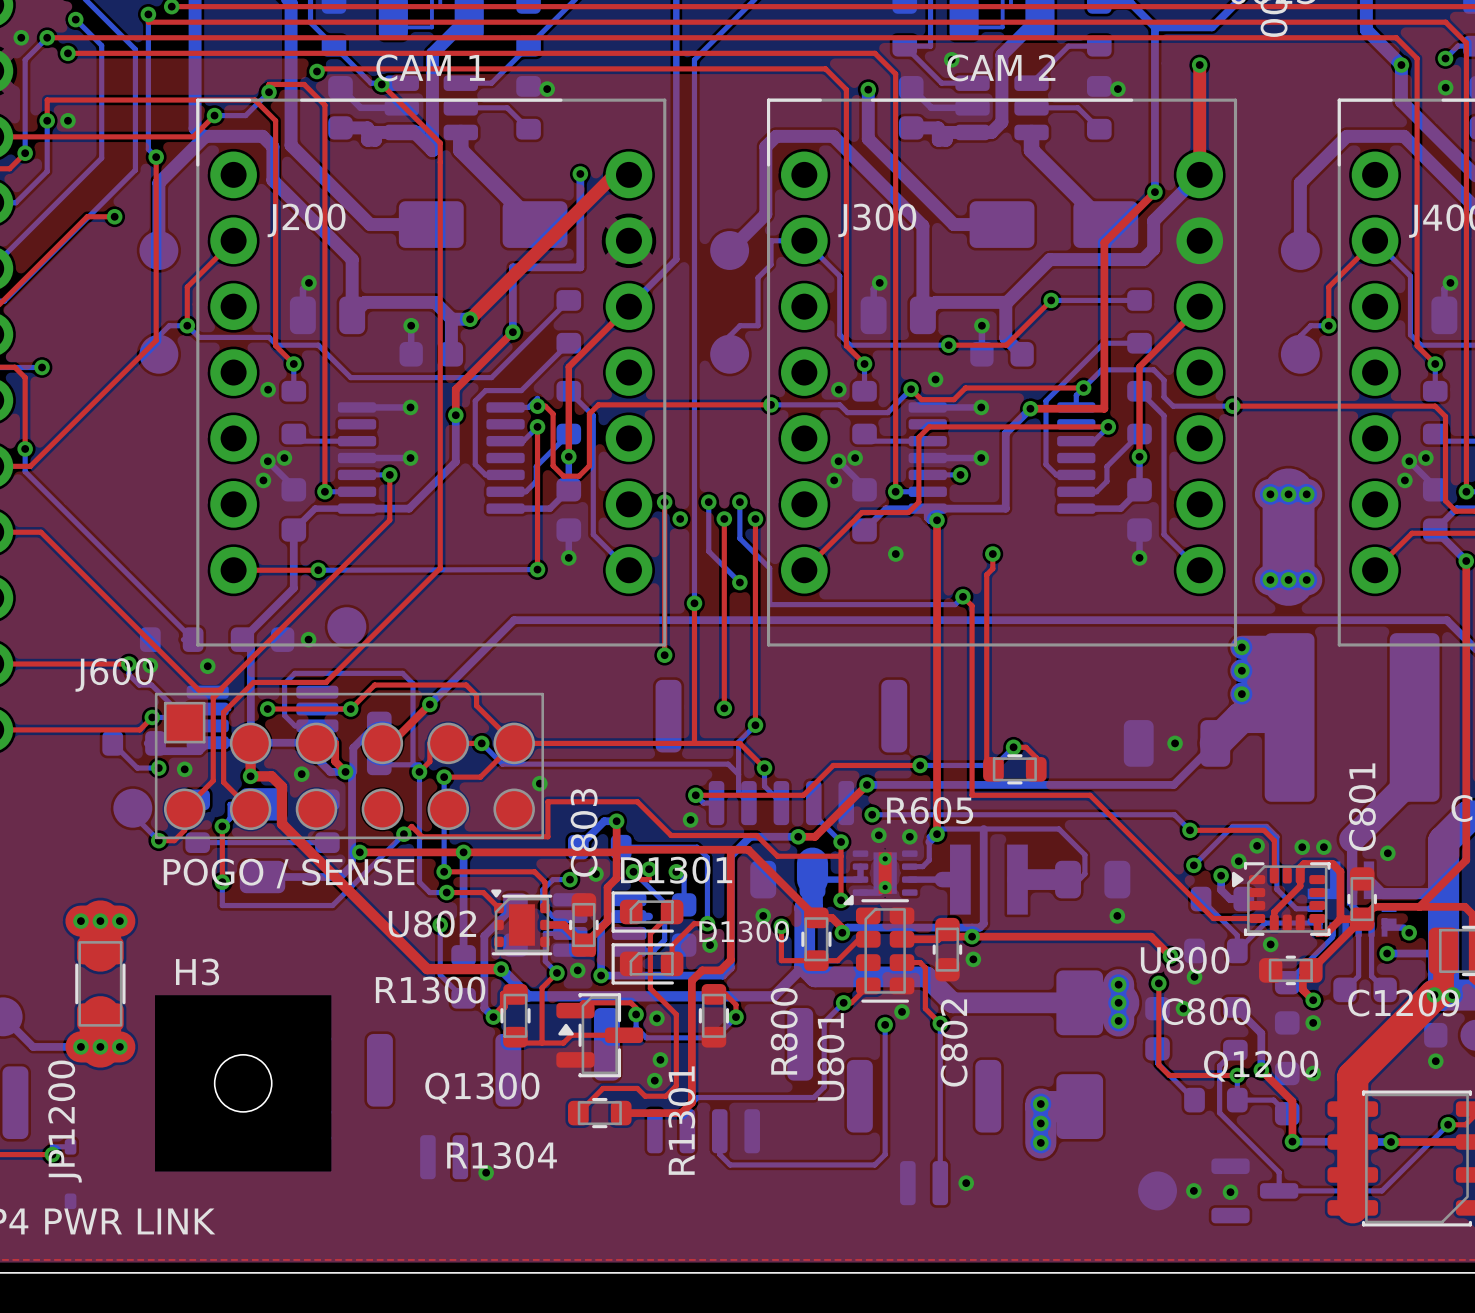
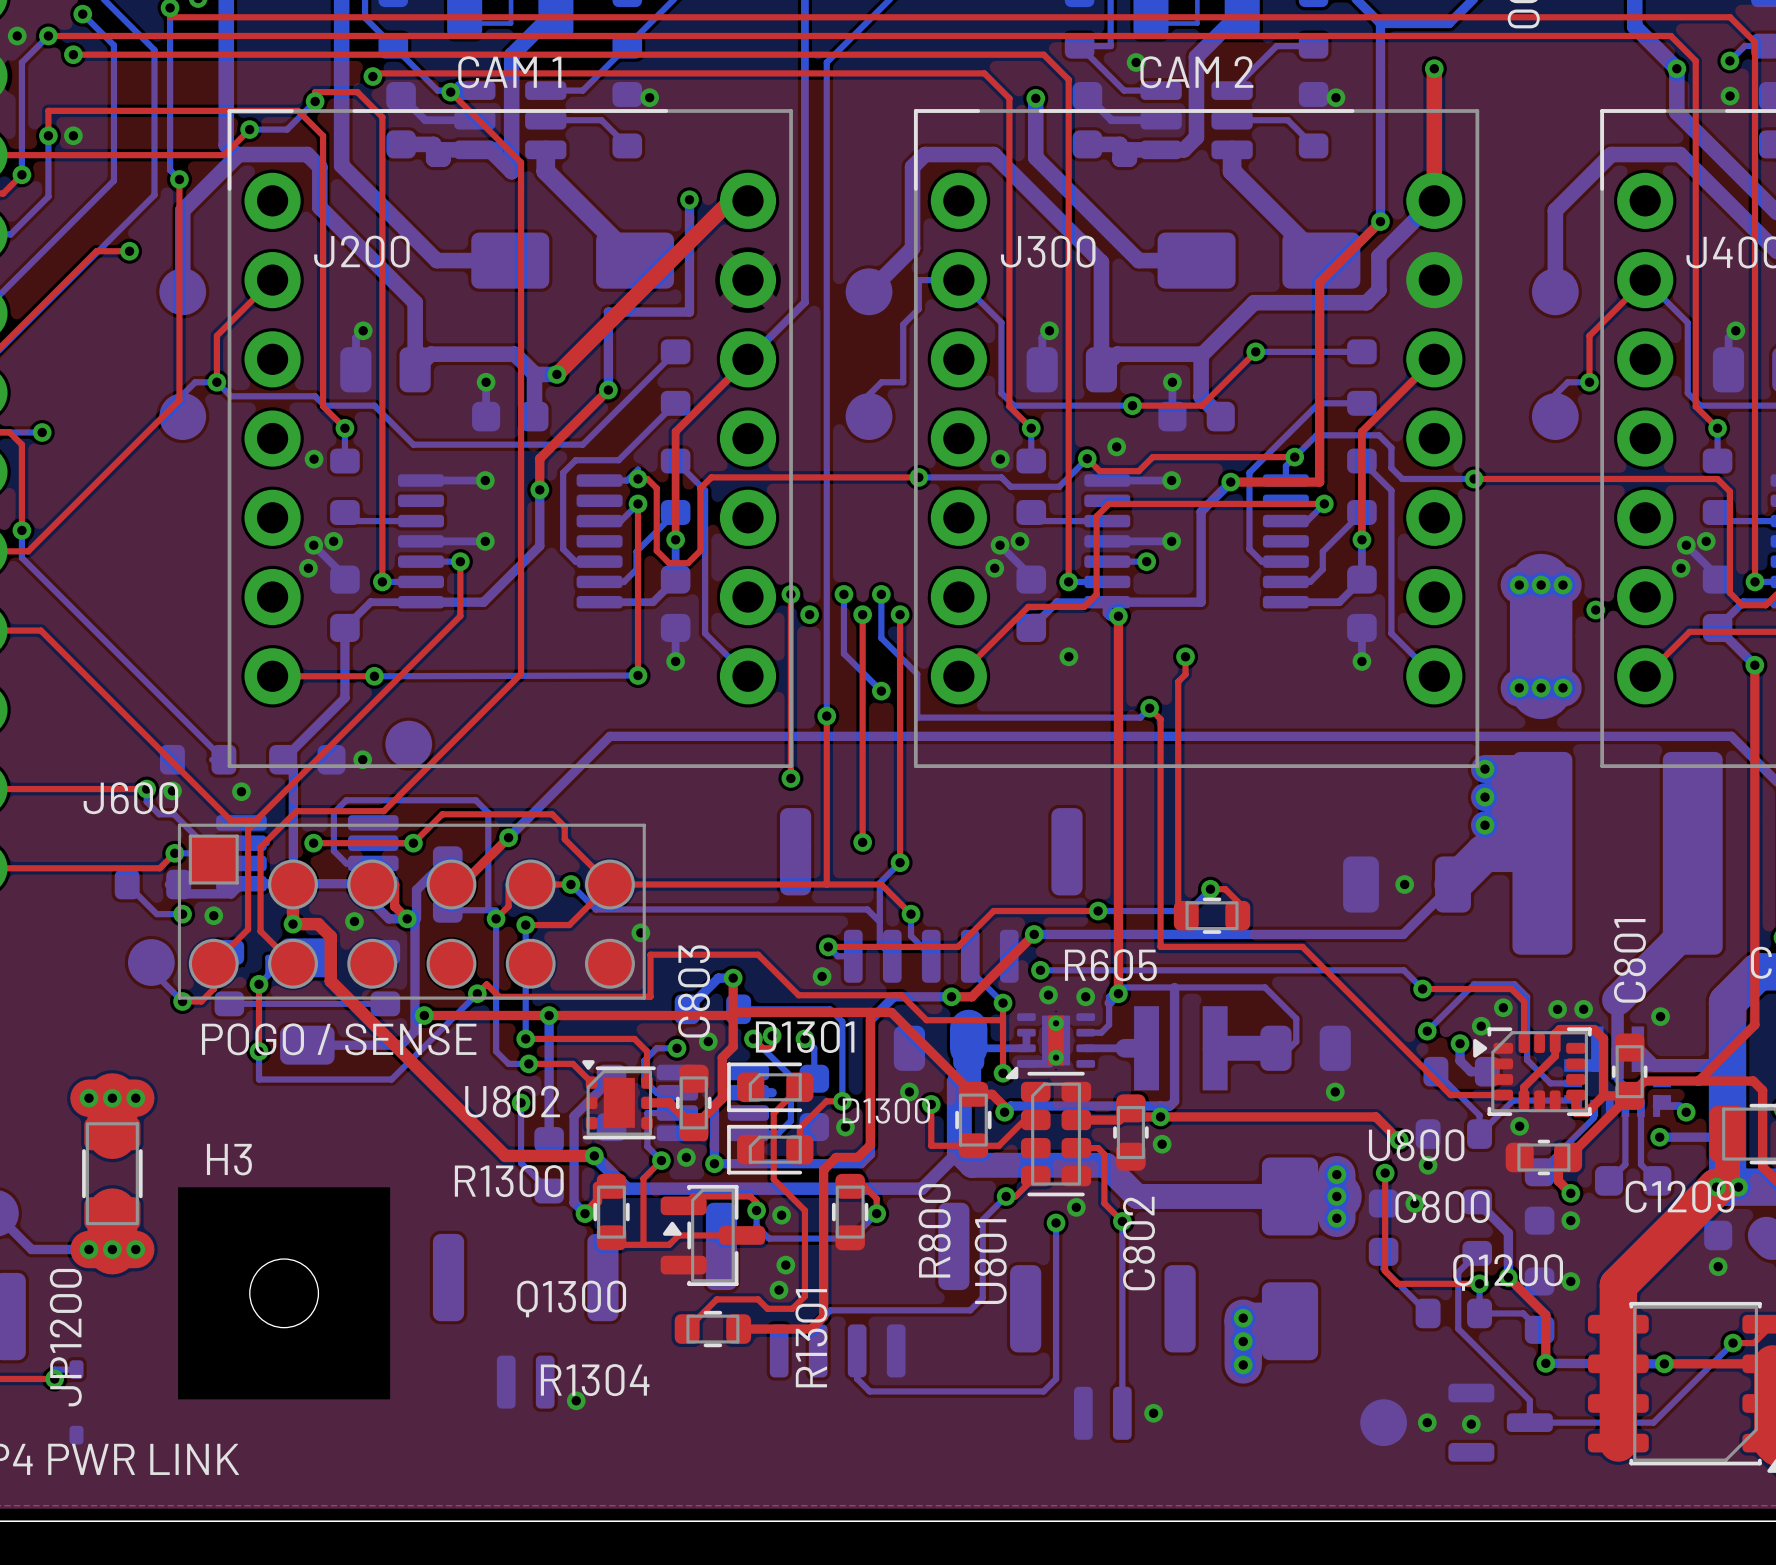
via: none -> (1595, 609)

